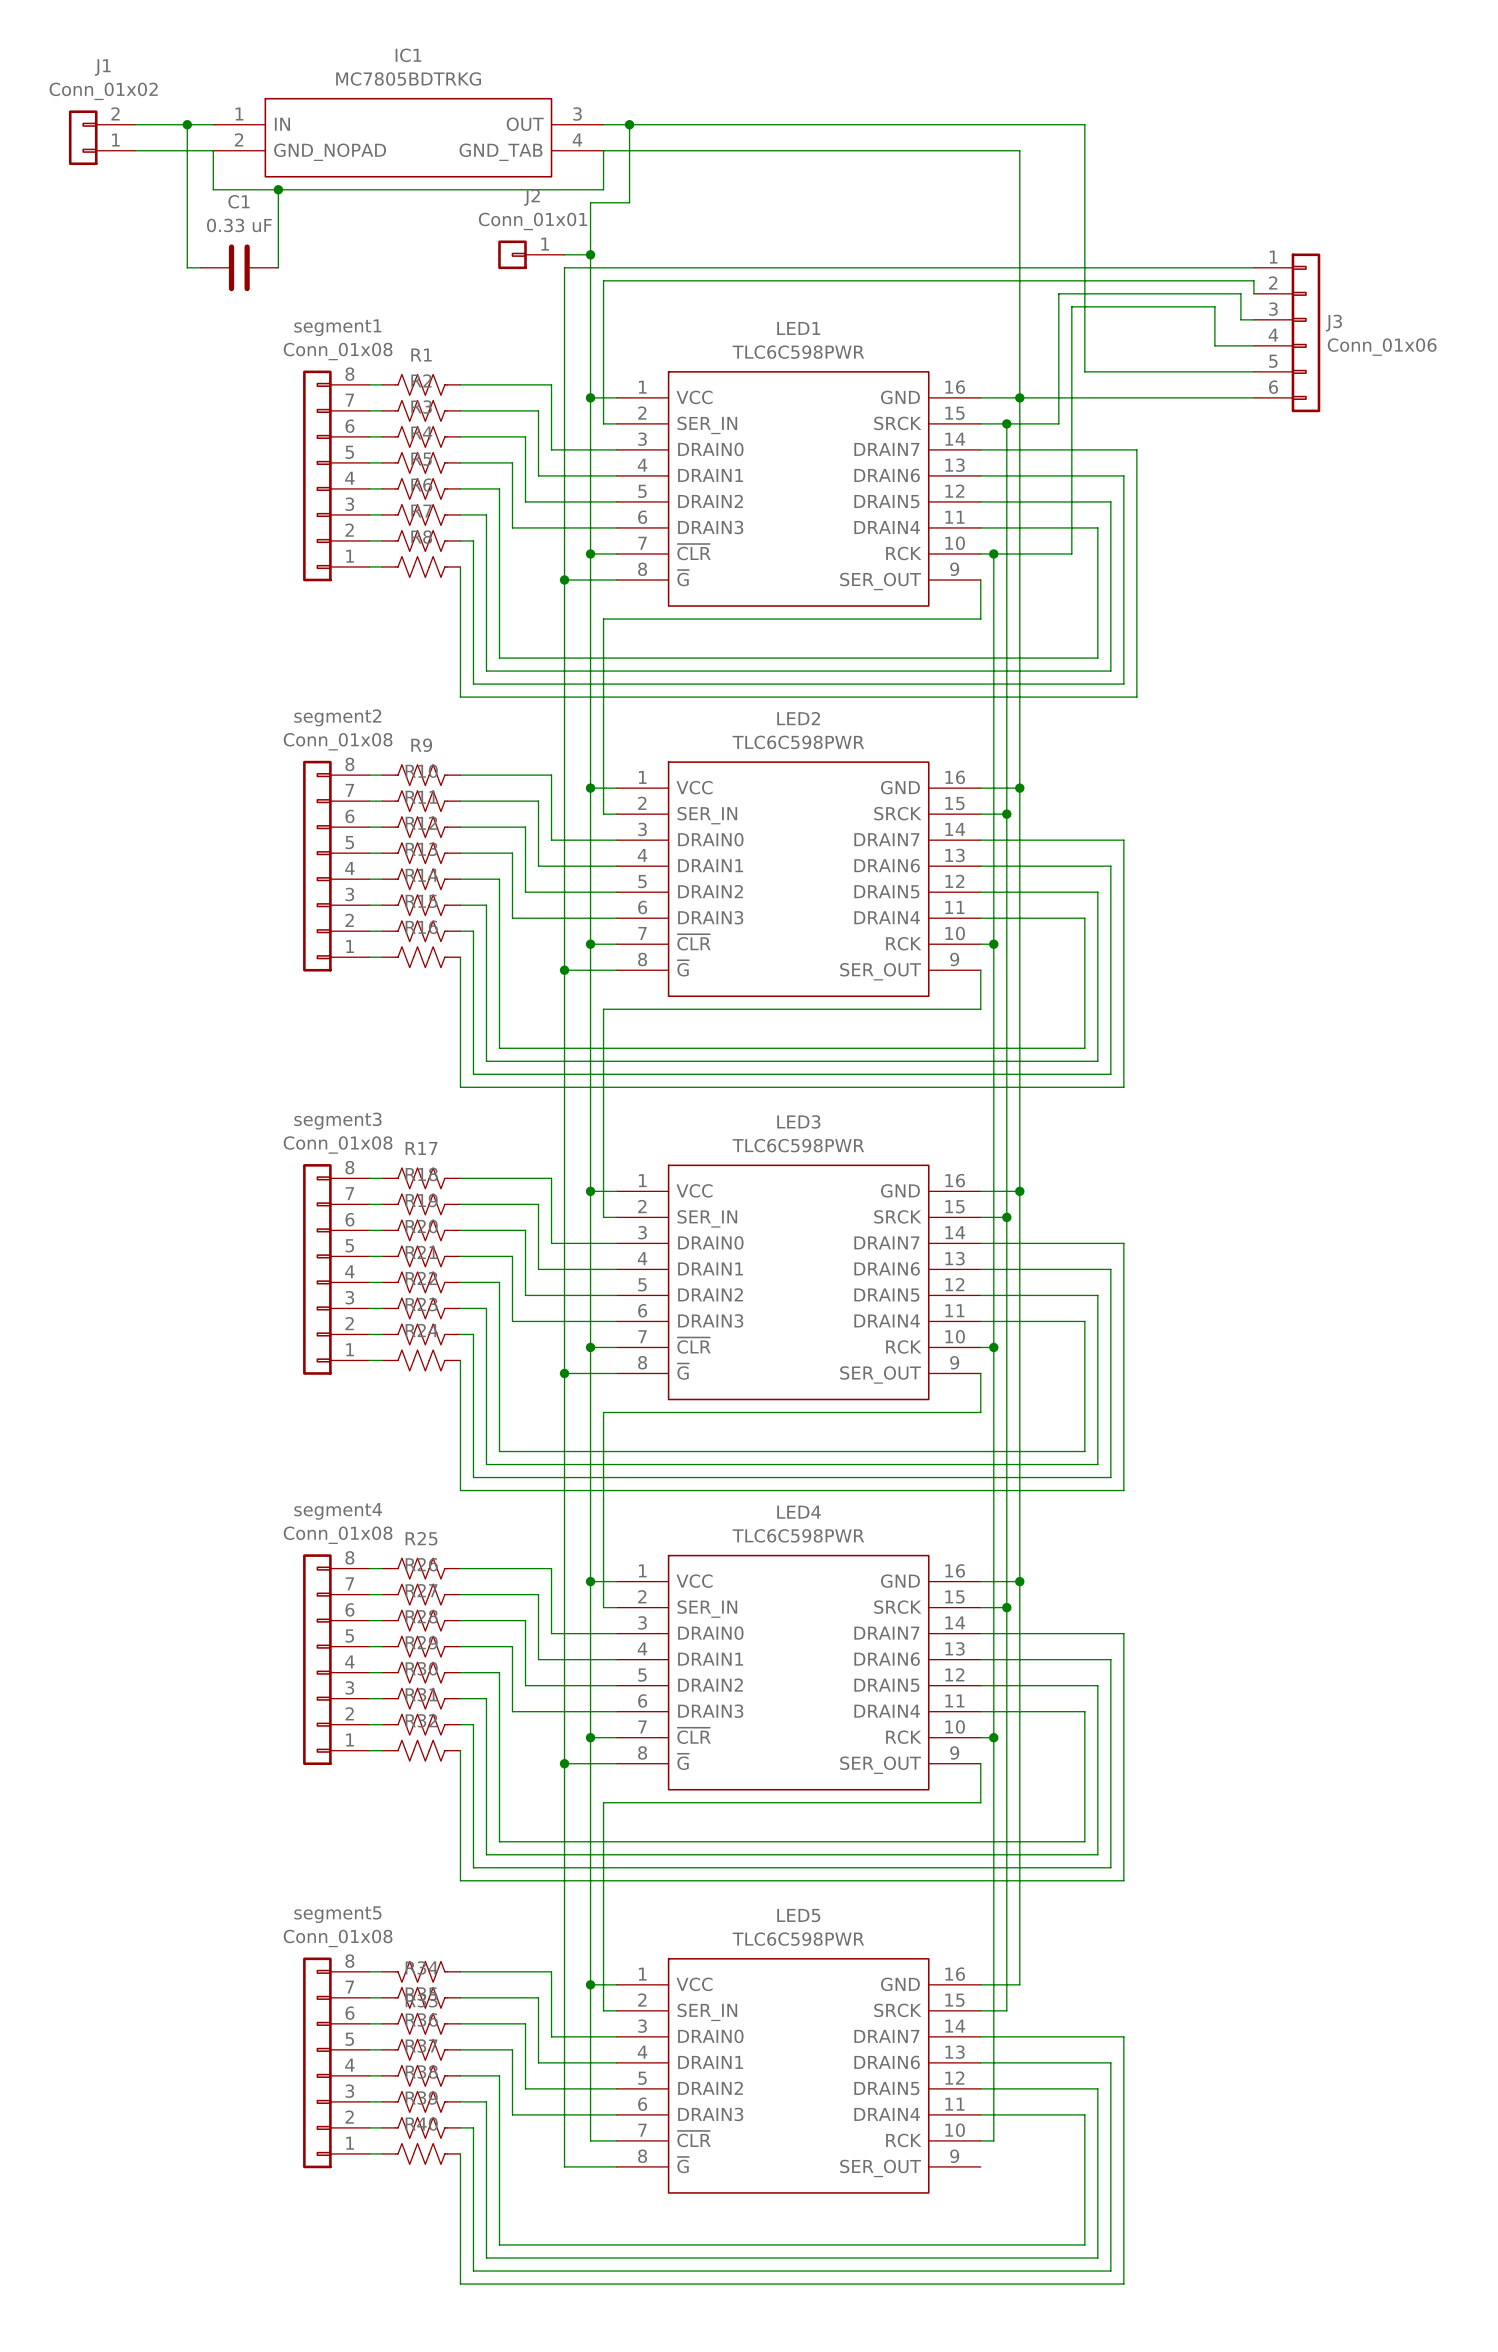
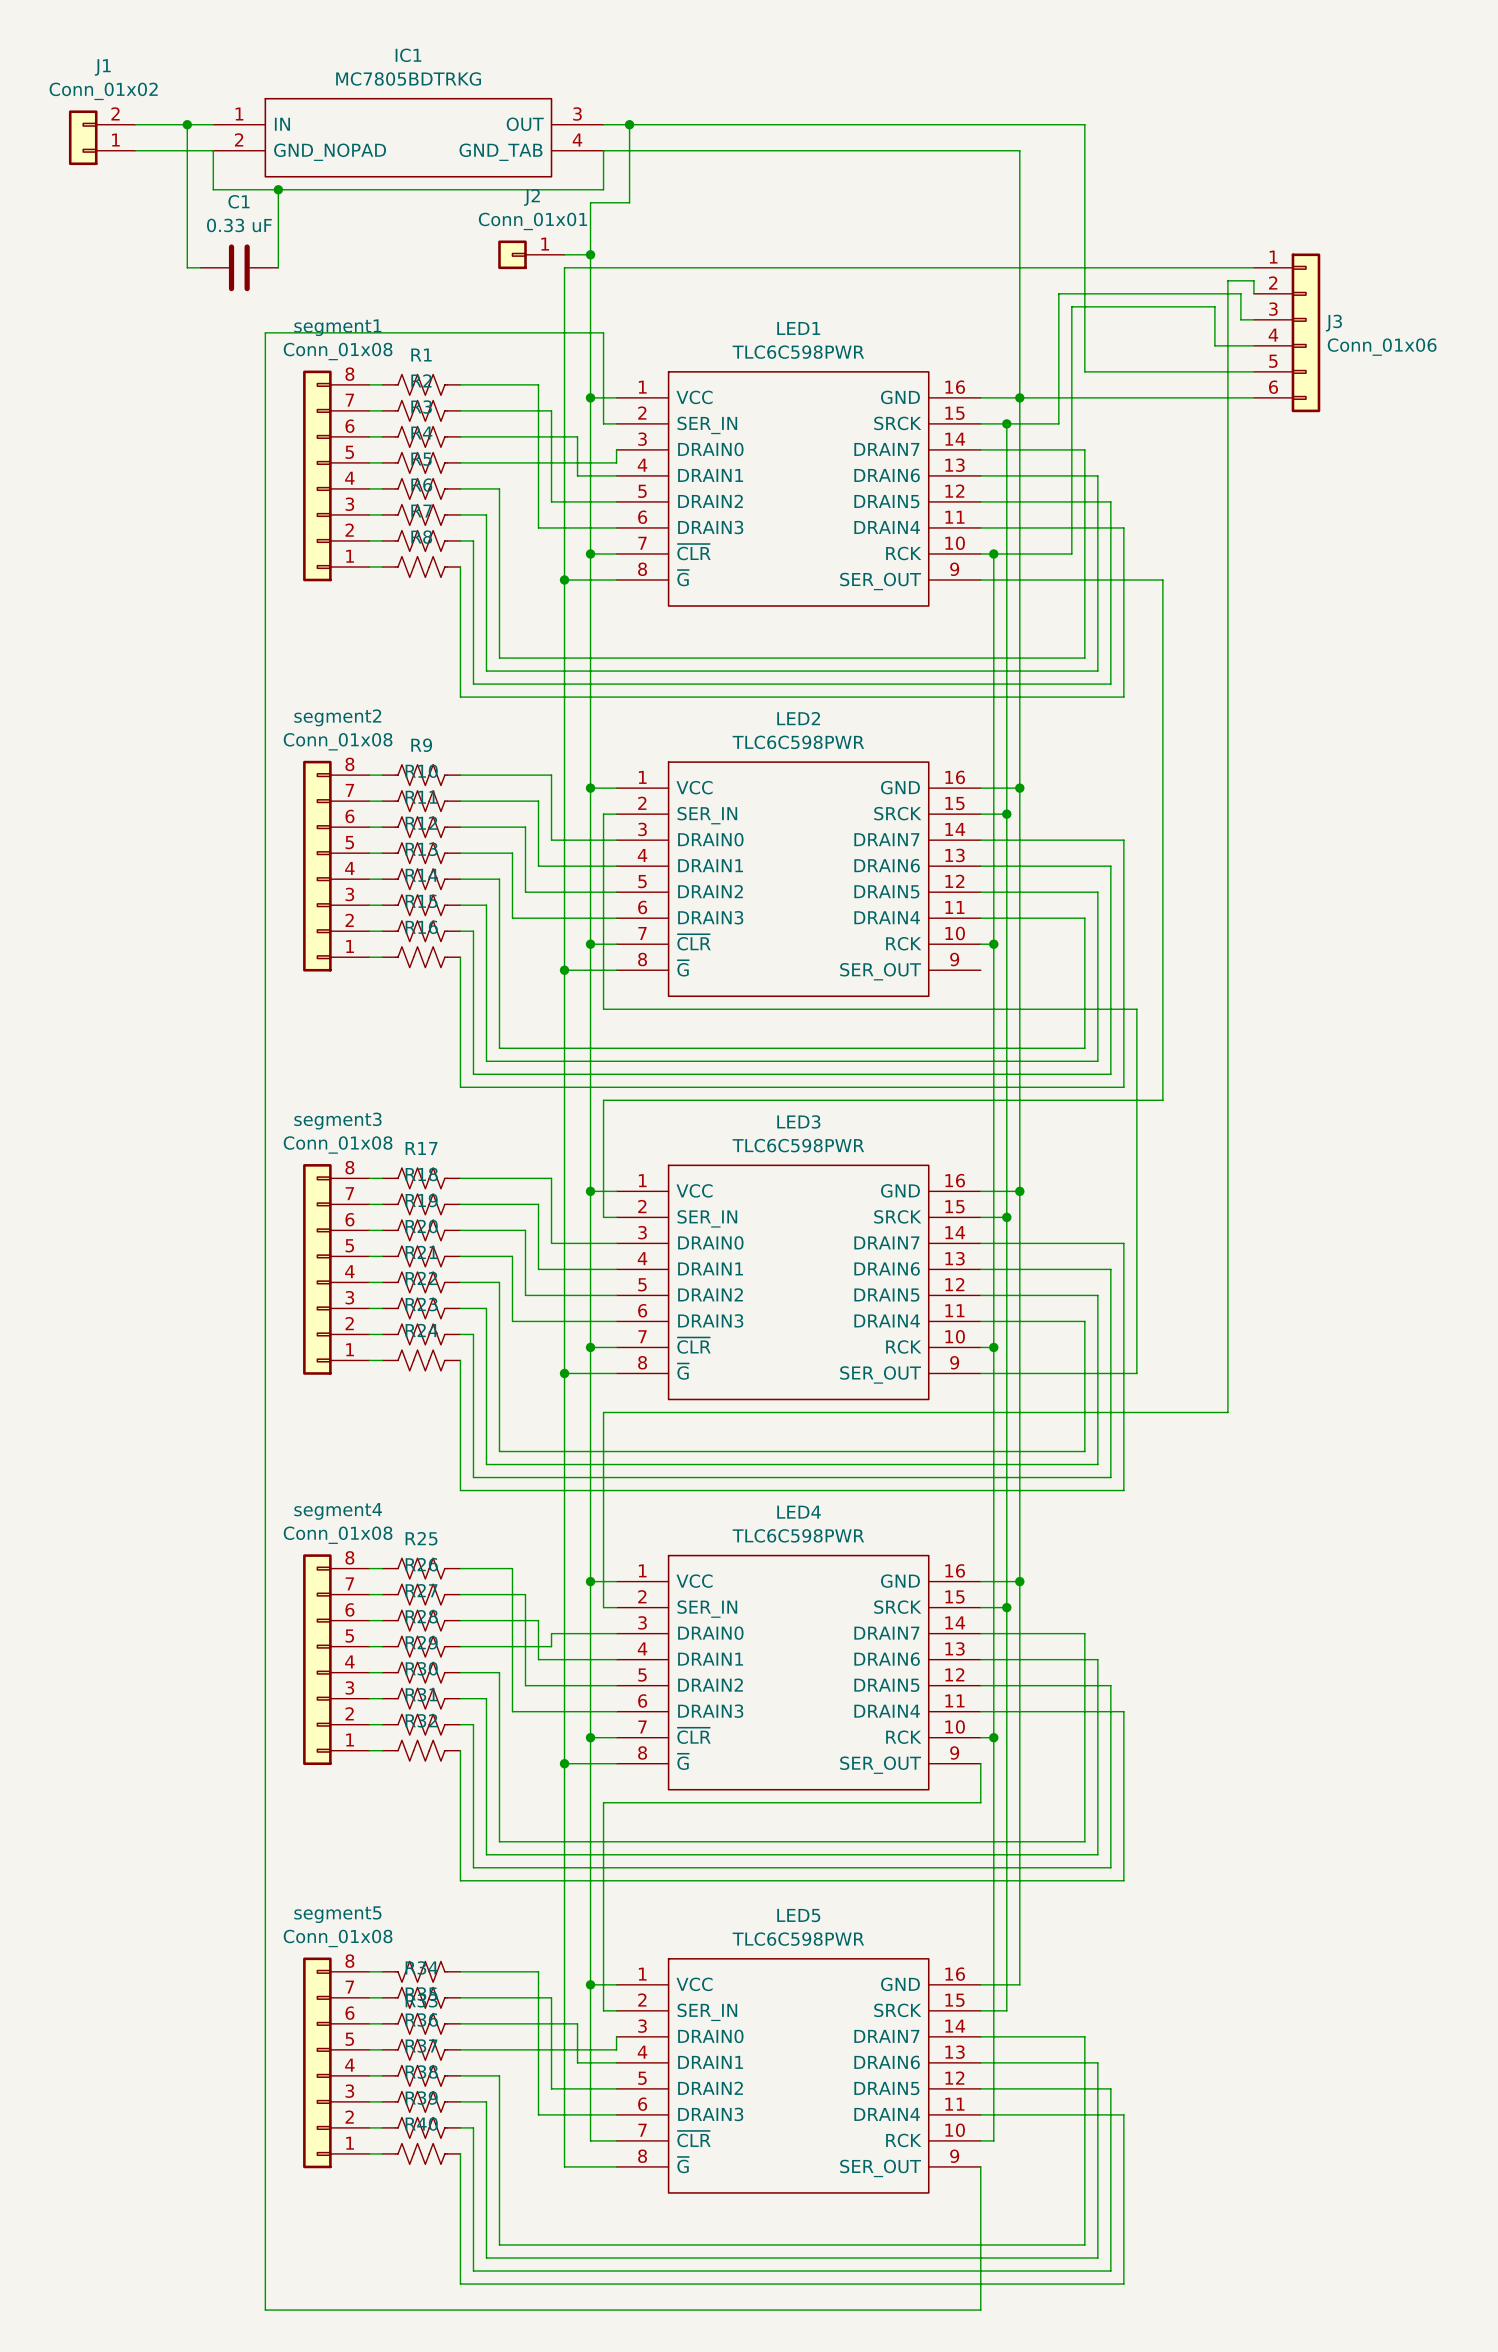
wire: (1227, 280) (603, 280) (603, 332) -> (980, 2166) (980, 2310) (265, 2310) (265, 332) (603, 332)
wire: (538, 384) (551, 384) (551, 410) -> (538, 384) (538, 410) (551, 410)
wire: (525, 436) (525, 501) (551, 501) -> (551, 449) (551, 501)
wire: (551, 449) (616, 449) -> (512, 462) (616, 462) (616, 449)
wire: (1084, 449) (1136, 449) (1136, 697) (1123, 697) -> (1084, 449) (1084, 658)
wire: (512, 462) (512, 527) (538, 527) -> (538, 475) (538, 527)
wire: (538, 475) (577, 475) -> (525, 436) (577, 436) (577, 475)
wire: (1097, 475) (1123, 475) (1123, 527) -> (1097, 475) (1097, 527) (1123, 527)
wire: (980, 580) (980, 619) (603, 619) (603, 814) -> (980, 580) (1162, 580) (1162, 1100) (603, 1100)
wire: (1084, 658) (1097, 658) -> (1097, 671) (1097, 658)
wire: (1097, 671) (1110, 671) -> (1110, 684) (1110, 671)
wire: (1110, 684) (1123, 684) -> (1123, 697) (1123, 684)
wire: (980, 970) (980, 1009) -> (980, 1373) (1136, 1373) (1136, 1009) (980, 1009)
wire: (603, 1009) (603, 1100) -> (603, 1009) (603, 814)
wire: (980, 1373) (980, 1412) -> (1227, 280) (1227, 1412) (980, 1412)
wire: (512, 1568) (551, 1568) (551, 1633) -> (512, 1568) (512, 1646) (551, 1646) (551, 1633)
wire: (525, 1594) (538, 1594) (538, 1620) -> (525, 1594) (525, 1620) (538, 1620)
wire: (1084, 1633) (1123, 1633) (1123, 1711) -> (1084, 1633) (1084, 1711) (1123, 1711)
wire: (1097, 1659) (1110, 1659) (1110, 1685) -> (1097, 1659) (1097, 1685) (1110, 1685)
wire: (538, 1971) (551, 1971) (551, 1997) -> (538, 1971) (538, 1997) (551, 1997)
wire: (525, 2023) (525, 2088) (551, 2088) -> (551, 2036) (551, 2088)
wire: (551, 2036) (616, 2036) -> (512, 2049) (616, 2049) (616, 2036)
wire: (1084, 2036) (1123, 2036) (1123, 2114) -> (1084, 2036) (1084, 2114) (1123, 2114)
wire: (512, 2049) (512, 2114) (538, 2114) -> (538, 2062) (538, 2114)
wire: (538, 2062) (577, 2062) -> (525, 2023) (577, 2023) (577, 2062)
wire: (1097, 2062) (1110, 2062) (1110, 2088) -> (1097, 2062) (1097, 2088) (1110, 2088)

